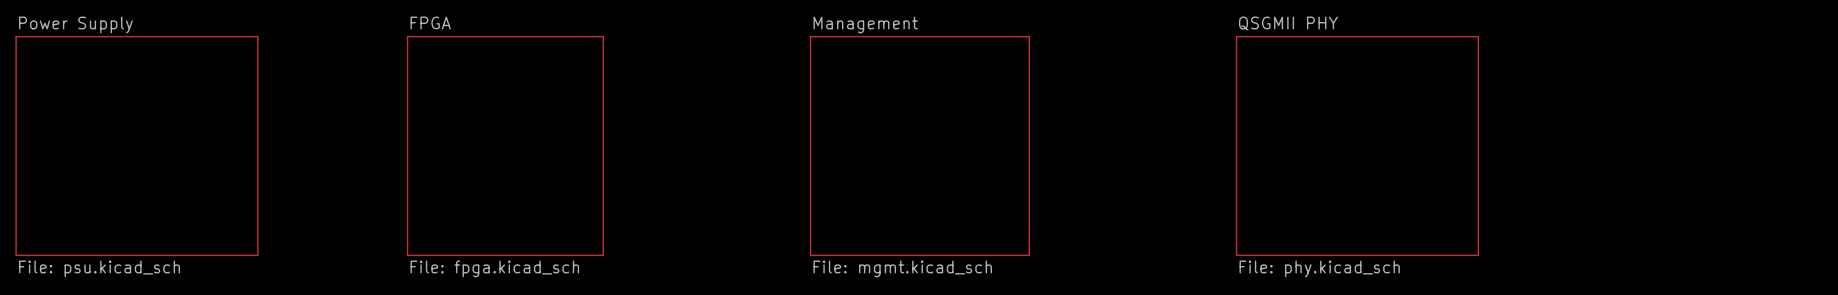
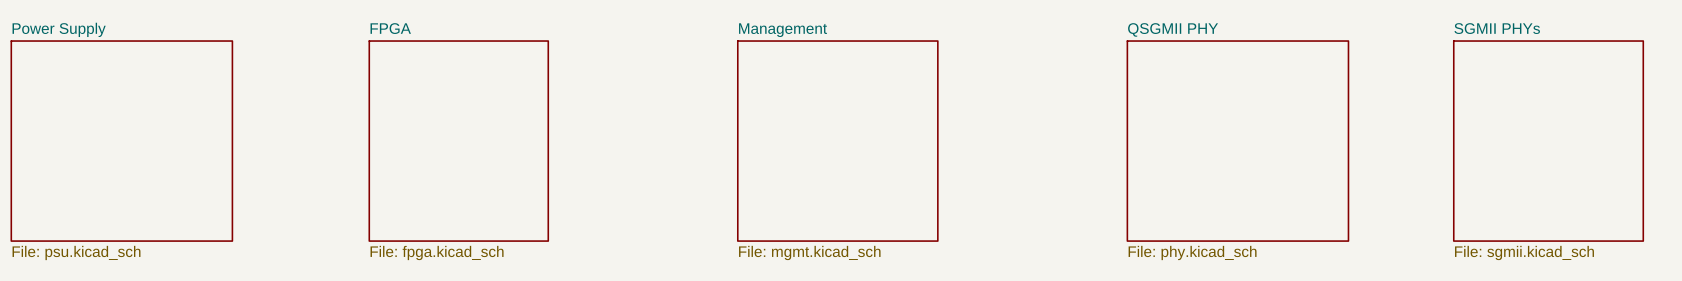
sheet SGMII PHYs: none -> File: sgmii.kicad_sch (1548, 141)

